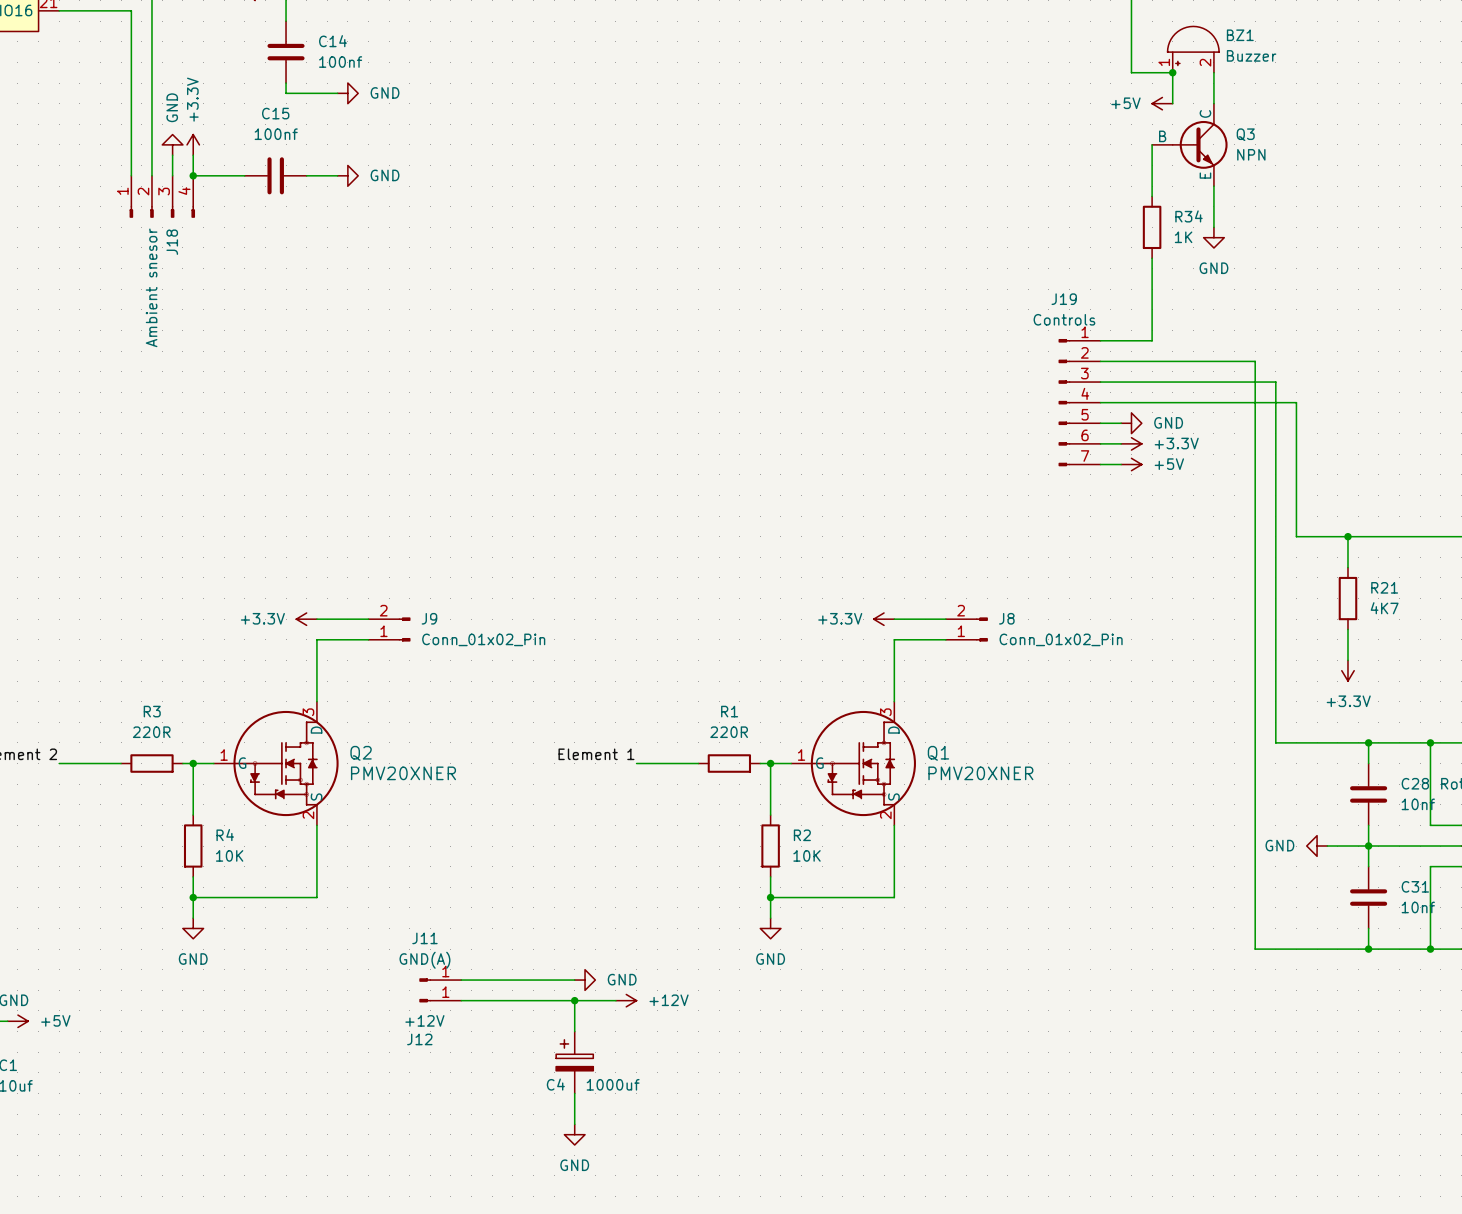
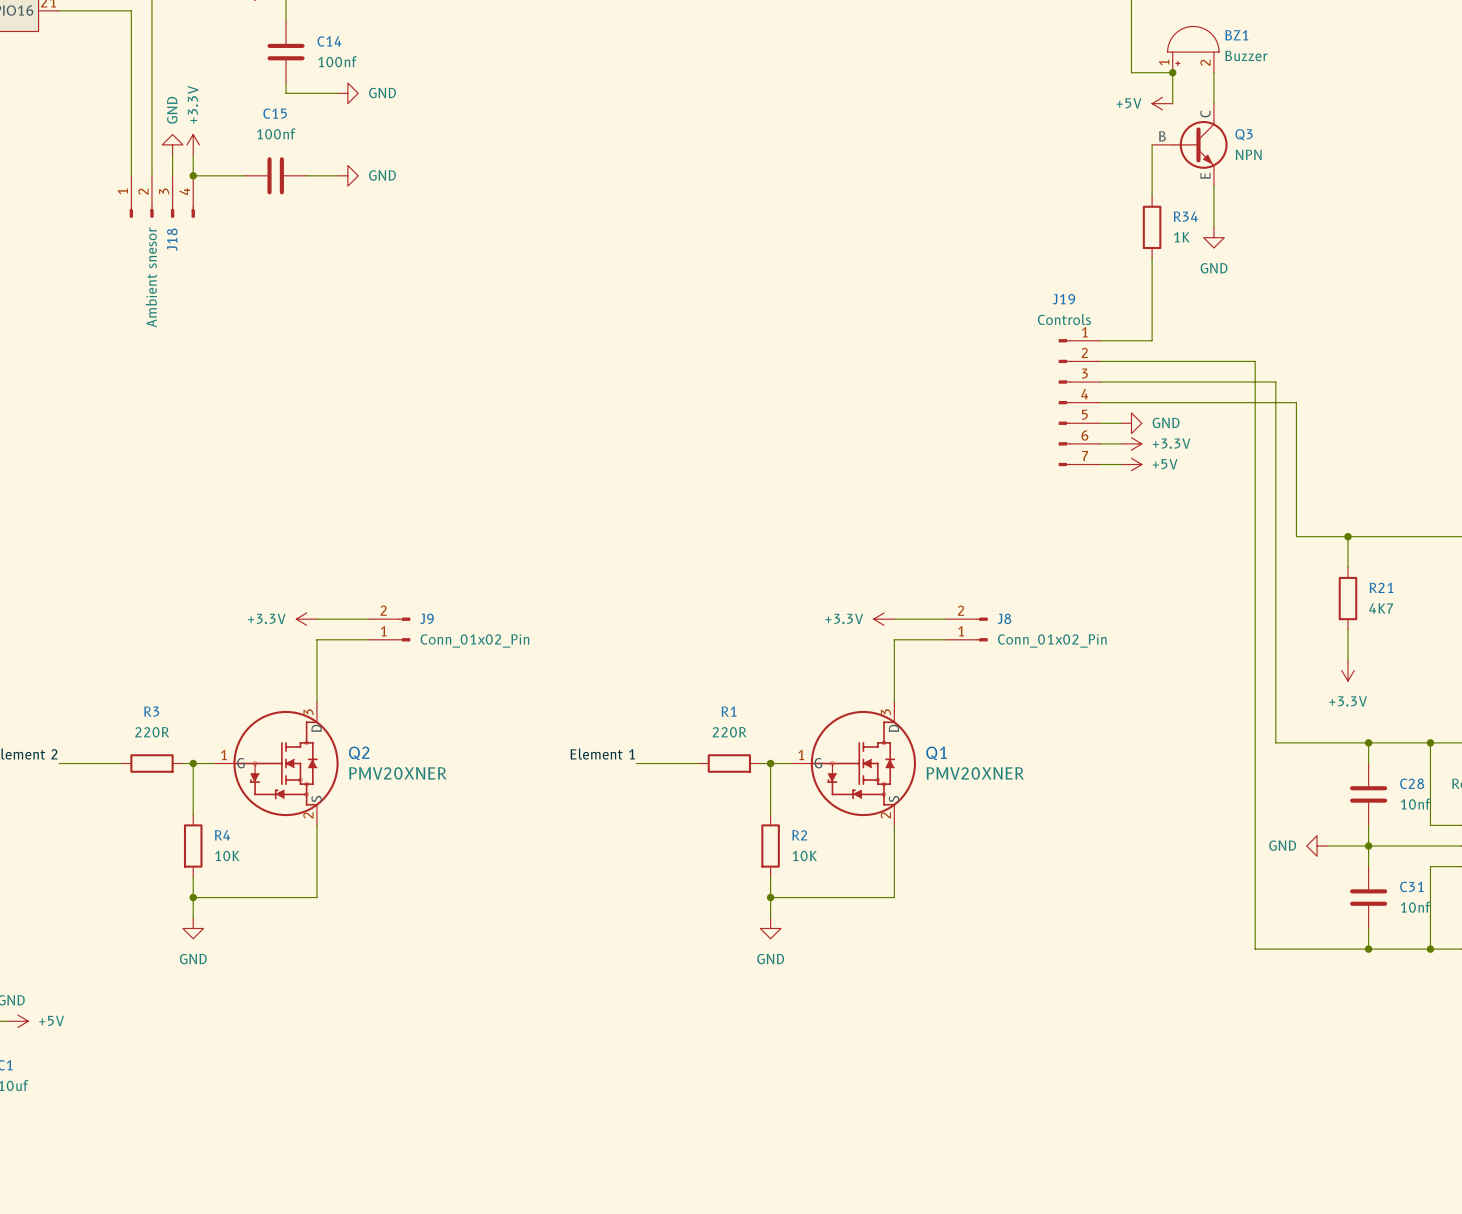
J11: GND(A) (440, 980) -> none
wire: (461, 980) (574, 980) -> none
power symbol: GND (585, 980) -> none
J12: +12V (440, 1000) -> none
wire: (461, 1000) (615, 1000) -> none
wire: (574, 1000) (574, 1031) -> none
junction: (574, 1000) -> none
power symbol: +12V (626, 1000) -> none
C4: 1000uf (574, 1062) -> none
wire: (574, 1093) (574, 1124) -> none
power symbol: GND (574, 1134) -> none

